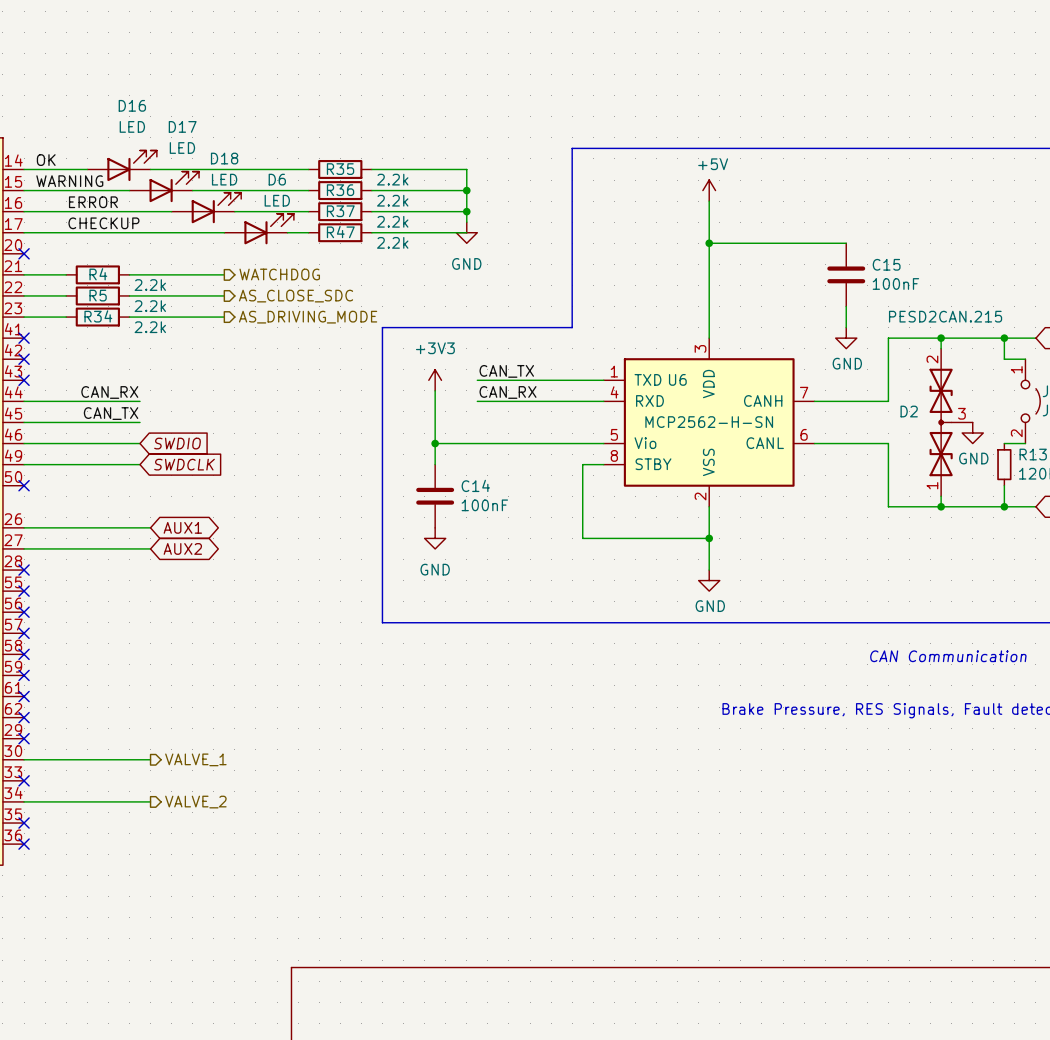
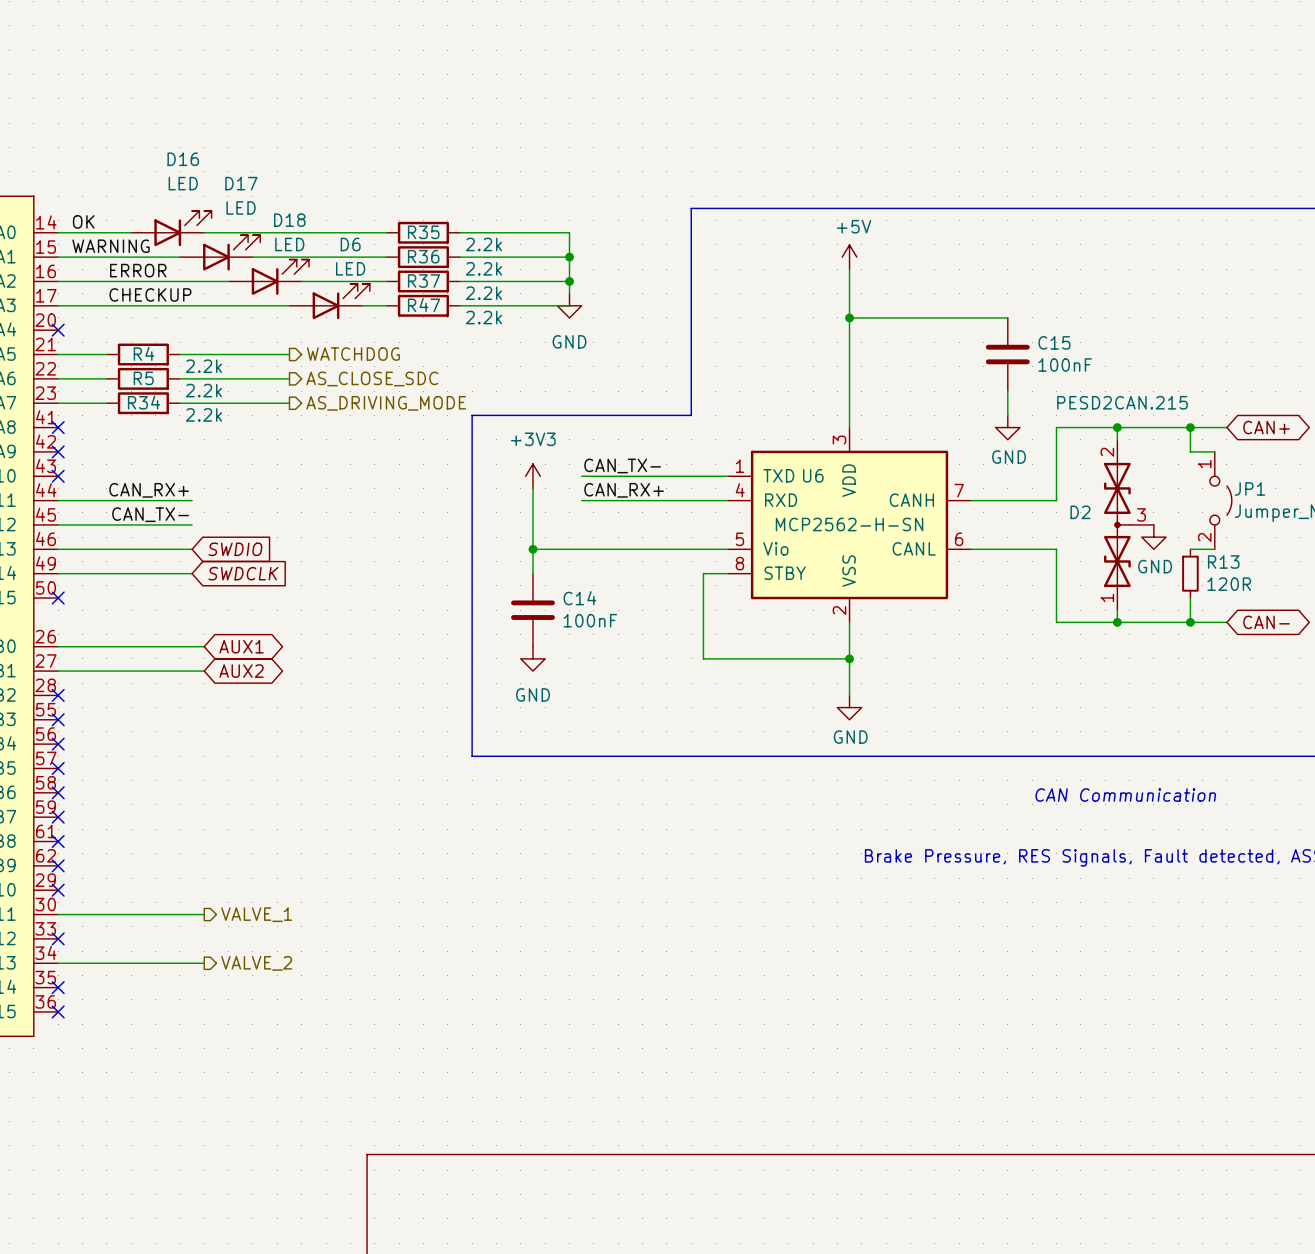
label: CAN_TX (506, 371) -> CAN_TX- (622, 465)
label: CAN_RX (109, 392) -> CAN_RX+ (149, 490)
label: CAN_RX (508, 392) -> CAN_RX+ (624, 490)
label: CAN_TX (111, 413) -> CAN_TX- (150, 514)

